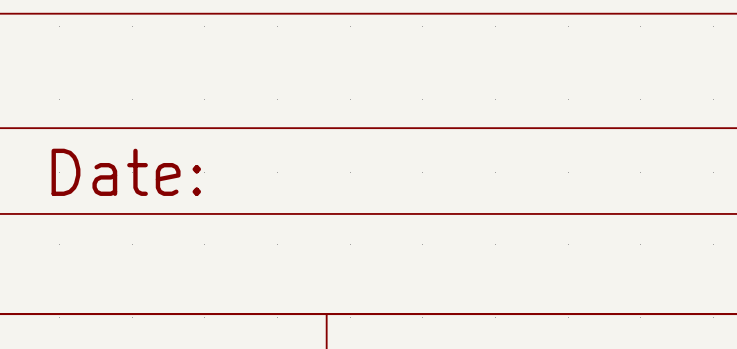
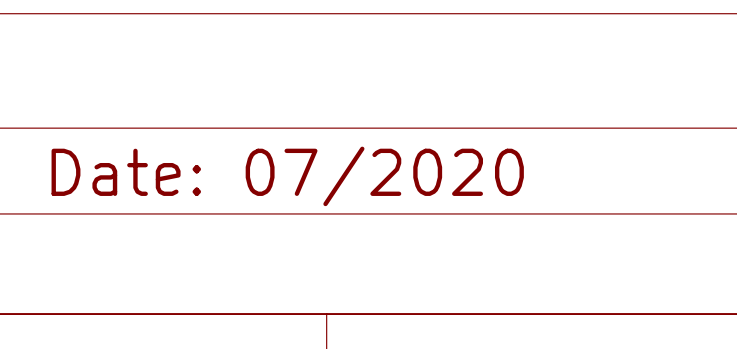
title block: Date: (126, 172) -> Date: 07/2020 (287, 176)

